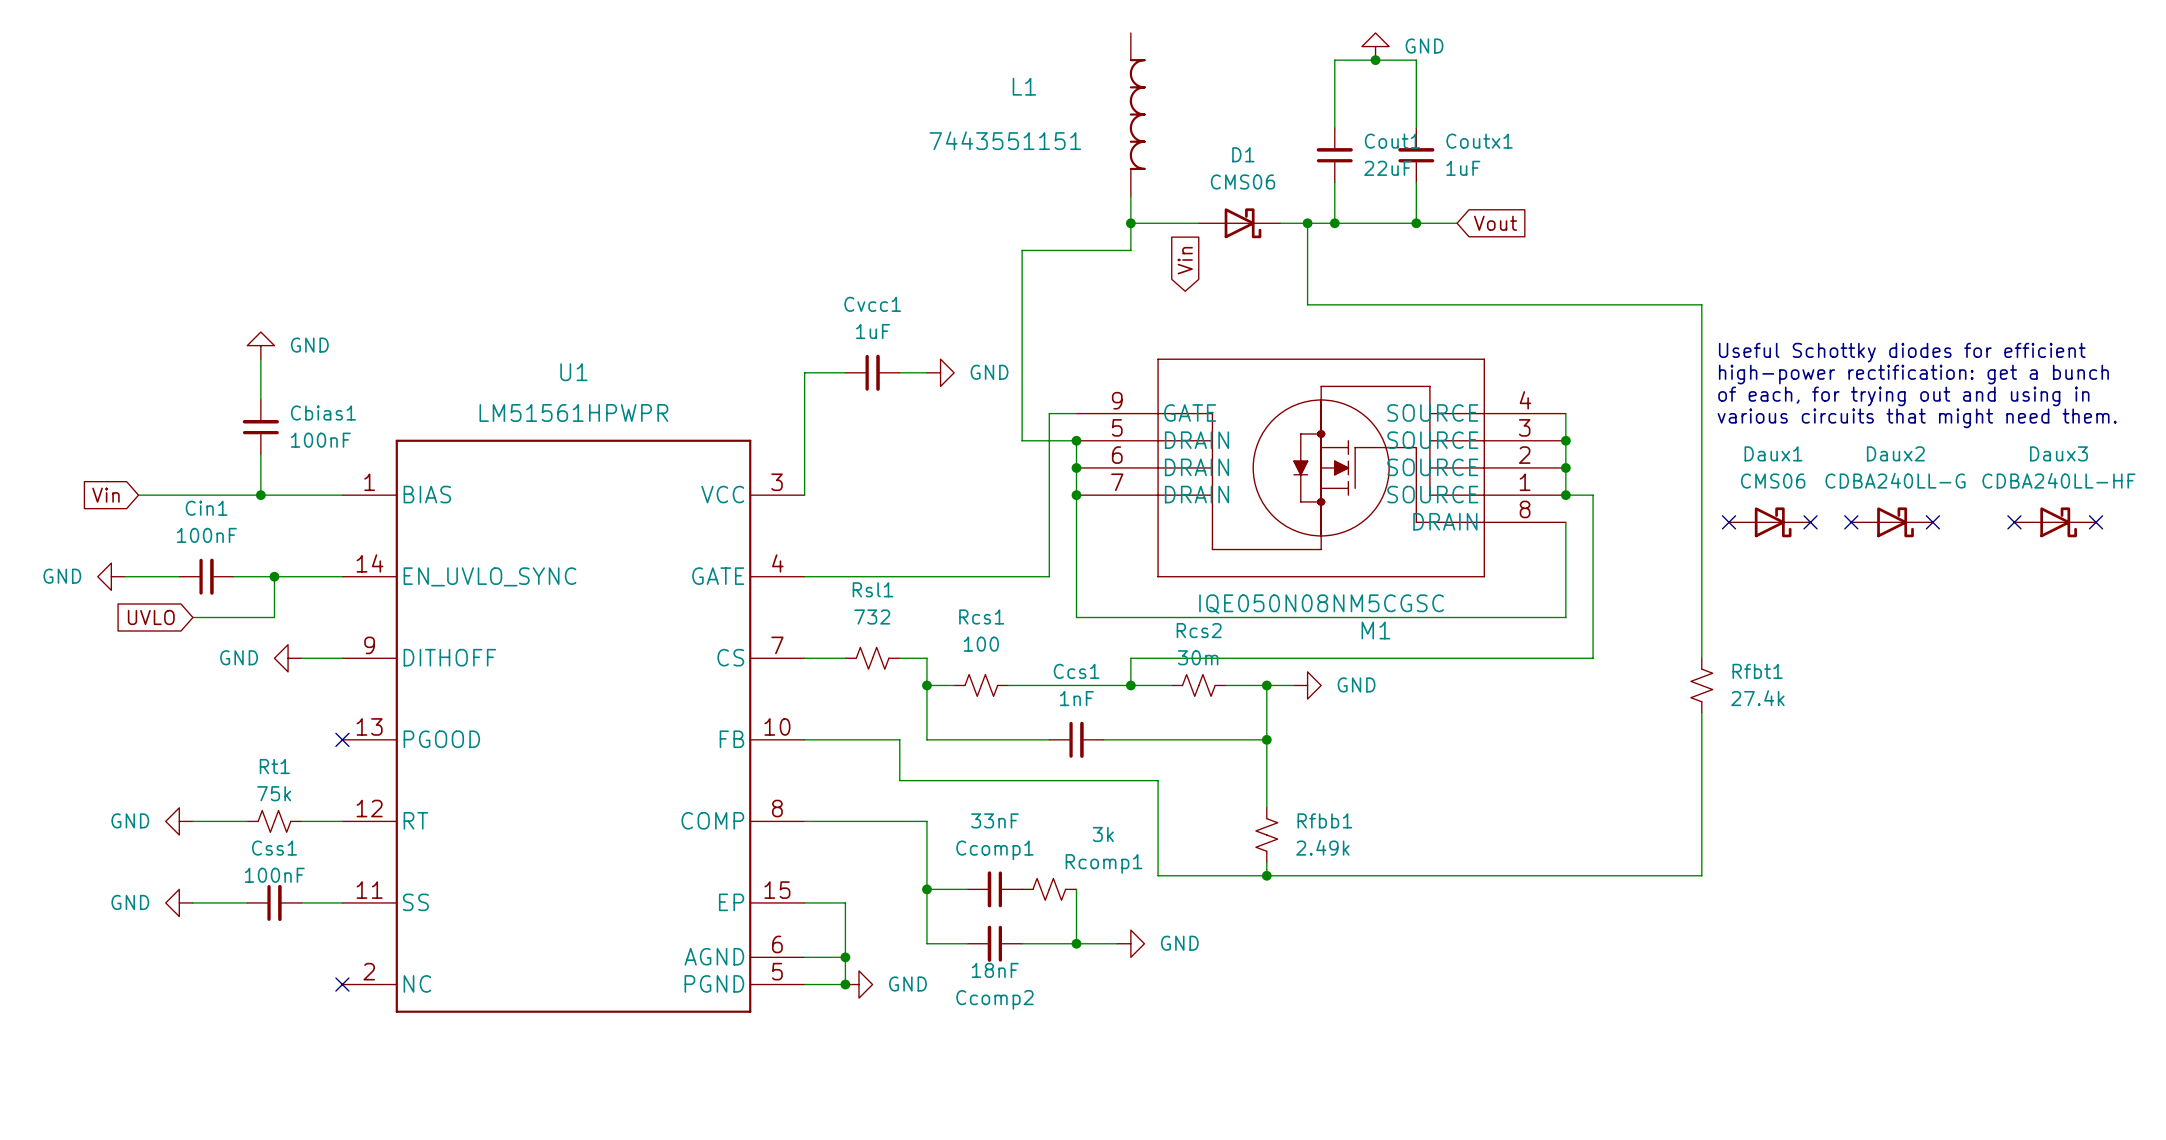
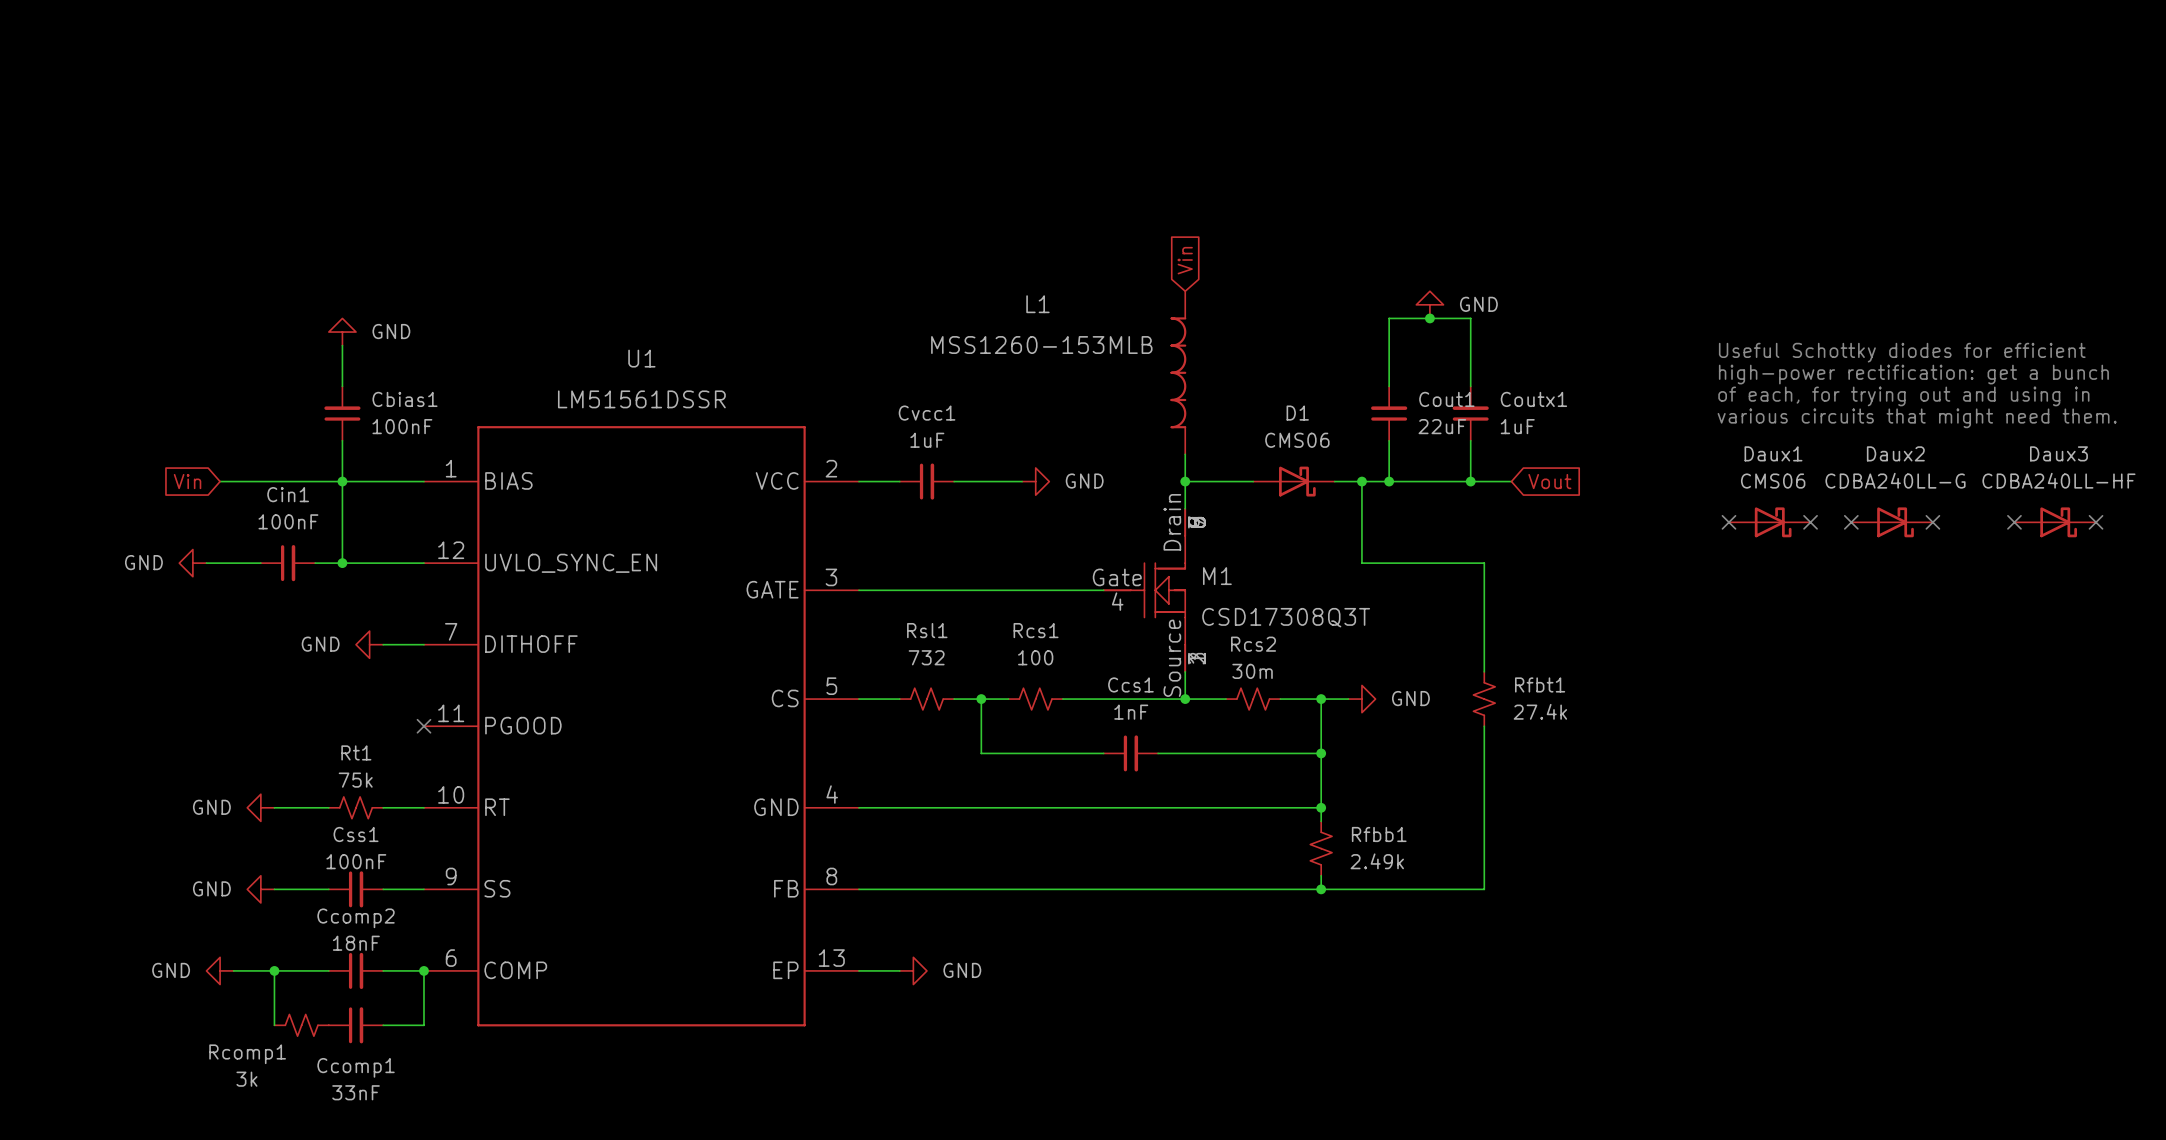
power symbol: GND (1375, 46) -> none
junction: (1375, 60) -> none
L1 name position: L1 (1024, 86) -> L1 (1037, 304)
L1 rotation: 0° (1137, 114) -> 180° (1178, 372)
L1 position: (1137, 114) -> (1178, 372)
wire: (1334, 128) (1334, 60) (1416, 60) (1416, 128) -> (1389, 386) (1389, 318) (1470, 318) (1470, 386)
L1 value: 7443551151 (1005, 140) -> MSS1260-153MLB (1041, 345)
Cout1 position: (1334, 155) -> (1389, 413)
Coutx1 position: (1416, 155) -> (1470, 413)
wire: (1334, 182) (1334, 223) -> (1389, 440) (1389, 481)
wire: (1416, 182) (1416, 223) -> (1470, 440) (1470, 481)
wire: (1130, 196) (1130, 250) (1022, 250) (1022, 440) (1076, 440) (1076, 617) (1565, 617) (1565, 522) -> none
wire: (1130, 223) (1198, 223) -> (1185, 481) (1253, 481)
junction: (1130, 223) -> none
D1 position: (1239, 223) -> (1293, 481)
wire: (1280, 223) (1457, 223) -> (1334, 481) (1511, 481)
wire: (1307, 223) (1307, 304) (1701, 304) (1701, 658) -> none
junction: (1307, 223) -> none
junction: (1334, 223) -> none
junction: (1416, 223) -> none
global label position: Vout (1495, 223) -> Vout (1549, 481)
power symbol: none -> GND (1429, 304)
junction: none -> (1429, 318)
power symbol position: GND (260, 345) -> GND (342, 332)
M1 symbol: [1076, 358, 1566, 578] -> [1102, 507, 1187, 673]
wire: (260, 359) (260, 400) -> (342, 345) (342, 386)
wire: (845, 372) (804, 372) (804, 495) -> none
Cvcc1 position: (872, 372) -> (926, 481)
wire: (899, 372) (926, 372) -> none
power symbol position: GND (940, 372) -> GND (1035, 481)
U1 value: LM51561HPWPR (573, 412) -> LM51561DSSR (641, 399)
wire: (1076, 413) (1049, 413) (1049, 576) (804, 576) -> none
wire: (1565, 413) (1565, 495) (1593, 495) (1593, 658) (1130, 658) (1130, 685) -> none
Cbias1 position: (260, 427) -> (342, 413)
U1 symbol: [342, 439, 805, 1013] -> [423, 426, 859, 1027]
wire: none -> (342, 440) (342, 563)
junction: (1076, 440) -> none
junction: (1565, 440) -> none
wire: (260, 454) (260, 495) -> none
wire: none -> (1185, 454) (1185, 508)
junction: (1076, 467) -> none
junction: (1565, 467) -> none
junction: none -> (342, 481)
wire: none -> (858, 481) (899, 481)
wire: none -> (954, 481) (1022, 481)
junction: none -> (1185, 481)
wire: none -> (1361, 481) (1361, 563) (1484, 563) (1484, 671)
junction: none -> (1361, 481)
junction: none -> (1389, 481)
junction: none -> (1470, 481)
global label position: Vin (105, 495) -> Vin (187, 481)
wire: (138, 495) (342, 495) -> (220, 481) (423, 481)
junction: (260, 495) -> none
junction: (1076, 495) -> none
junction: (1565, 495) -> none
power symbol: none -> GND (192, 563)
junction: none -> (342, 563)
power symbol: GND (111, 576) -> none
wire: (124, 576) (179, 576) -> (206, 563) (260, 563)
Cin1 position: (206, 576) -> (288, 563)
wire: (233, 576) (342, 576) -> (315, 563) (423, 563)
wire: (274, 576) (274, 617) (192, 617) -> none
junction: (274, 576) -> none
wire: none -> (858, 590) (1103, 590)
M1 value: IQE050N08NM5CGSC (1321, 604) -> CSD17308Q3T (1286, 617)
global label: UVLO (151, 617) -> none
M1 name position: M1 (1375, 630) -> M1 (1217, 576)
power symbol: none -> GND (369, 644)
power symbol: GND (288, 658) -> none
wire: (301, 658) (342, 658) -> (383, 644) (423, 644)
wire: (804, 658) (845, 658) -> (858, 699) (899, 699)
Rsl1 position: (872, 658) -> (926, 699)
wire: (899, 658) (926, 658) (926, 739) (1049, 739) -> none
wire: none -> (1185, 671) (1185, 699)
wire: (926, 685) (954, 685) -> none
junction position: (926, 685) -> (981, 699)
Rcs1 position: (981, 685) -> (1035, 699)
wire: (1008, 685) (1171, 685) -> (1062, 699) (1226, 699)
junction: (1130, 685) -> none
Rcs2 position: (1198, 685) -> (1253, 699)
wire: (1226, 685) (1293, 685) -> (1280, 699) (1348, 699)
wire: (1266, 685) (1266, 807) -> (1321, 699) (1321, 821)
junction: (1266, 685) -> none
power symbol position: GND (1307, 685) -> GND (1361, 699)
Rfbt1 position: (1701, 685) -> (1484, 699)
wire: none -> (954, 699) (1008, 699)
wire: none -> (981, 699) (981, 753) (1103, 753)
junction: none -> (1185, 699)
junction: none -> (1321, 699)
wire: (1701, 712) (1701, 875) (1158, 875) (1158, 780) (899, 780) (899, 739) (804, 739) -> none
no-connect mark: none -> (423, 726)
wire: none -> (1484, 726) (1484, 889) (967, 889)
no-connect mark: (342, 739) -> none
Ccs1 position: (1076, 739) -> (1130, 753)
wire: (1103, 739) (1266, 739) -> (1158, 753) (1321, 753)
junction: (1266, 739) -> none
junction: none -> (1321, 753)
power symbol: none -> GND (260, 807)
wire: none -> (858, 807) (1321, 807)
junction: none -> (1321, 807)
power symbol: GND (179, 821) -> none
wire: (192, 821) (247, 821) -> (274, 807) (328, 807)
Rt1 position: (274, 821) -> (356, 807)
wire: (301, 821) (342, 821) -> (383, 807) (423, 807)
wire: (804, 821) (926, 821) (926, 943) (967, 943) -> none
Rcomp1 value position: 3k (1103, 834) -> 3k (246, 1079)
Rfbb1 position: (1266, 835) -> (1321, 848)
wire: (1266, 862) (1266, 875) -> (1321, 875) (1321, 889)
Rcomp1 name position: Rcomp1 (1104, 863) -> Rcomp1 (247, 1054)
junction: (1266, 875) -> none
power symbol: none -> GND (260, 889)
wire: none -> (858, 889) (926, 889)
junction: (926, 889) -> none
Ccomp1 rotation: 0° (994, 889) -> 180° (356, 1025)
Ccomp1 position: (994, 889) -> (356, 1025)
Rcomp1 position: (1049, 889) -> (301, 1025)
wire: (1076, 889) (1076, 943) -> none
junction: none -> (1321, 889)
power symbol: GND (179, 902) -> none
wire: (192, 902) (247, 902) -> (274, 889) (328, 889)
Css1 position: (274, 902) -> (356, 889)
wire: (301, 902) (342, 902) -> (383, 889) (423, 889)
wire: (804, 902) (845, 902) (845, 984) (804, 984) -> none
Ccomp2 rotation: 0° (994, 943) -> 180° (356, 970)
Ccomp2 position: (994, 943) -> (356, 970)
wire: (1022, 943) (1117, 943) -> none
junction: (1076, 943) -> none
power symbol: GND (1130, 943) -> none
wire: (804, 957) (845, 957) -> (858, 970) (899, 970)
junction: (845, 957) -> none
power symbol: none -> GND (220, 970)
wire: none -> (233, 970) (328, 970)
wire: none -> (274, 970) (274, 1025)
junction: none -> (274, 970)
wire: none -> (383, 970) (423, 970) (423, 1025) (383, 1025)
junction: none -> (423, 970)
no-connect mark: (342, 984) -> none
junction: (845, 984) -> none
power symbol position: GND (858, 984) -> GND (913, 970)

